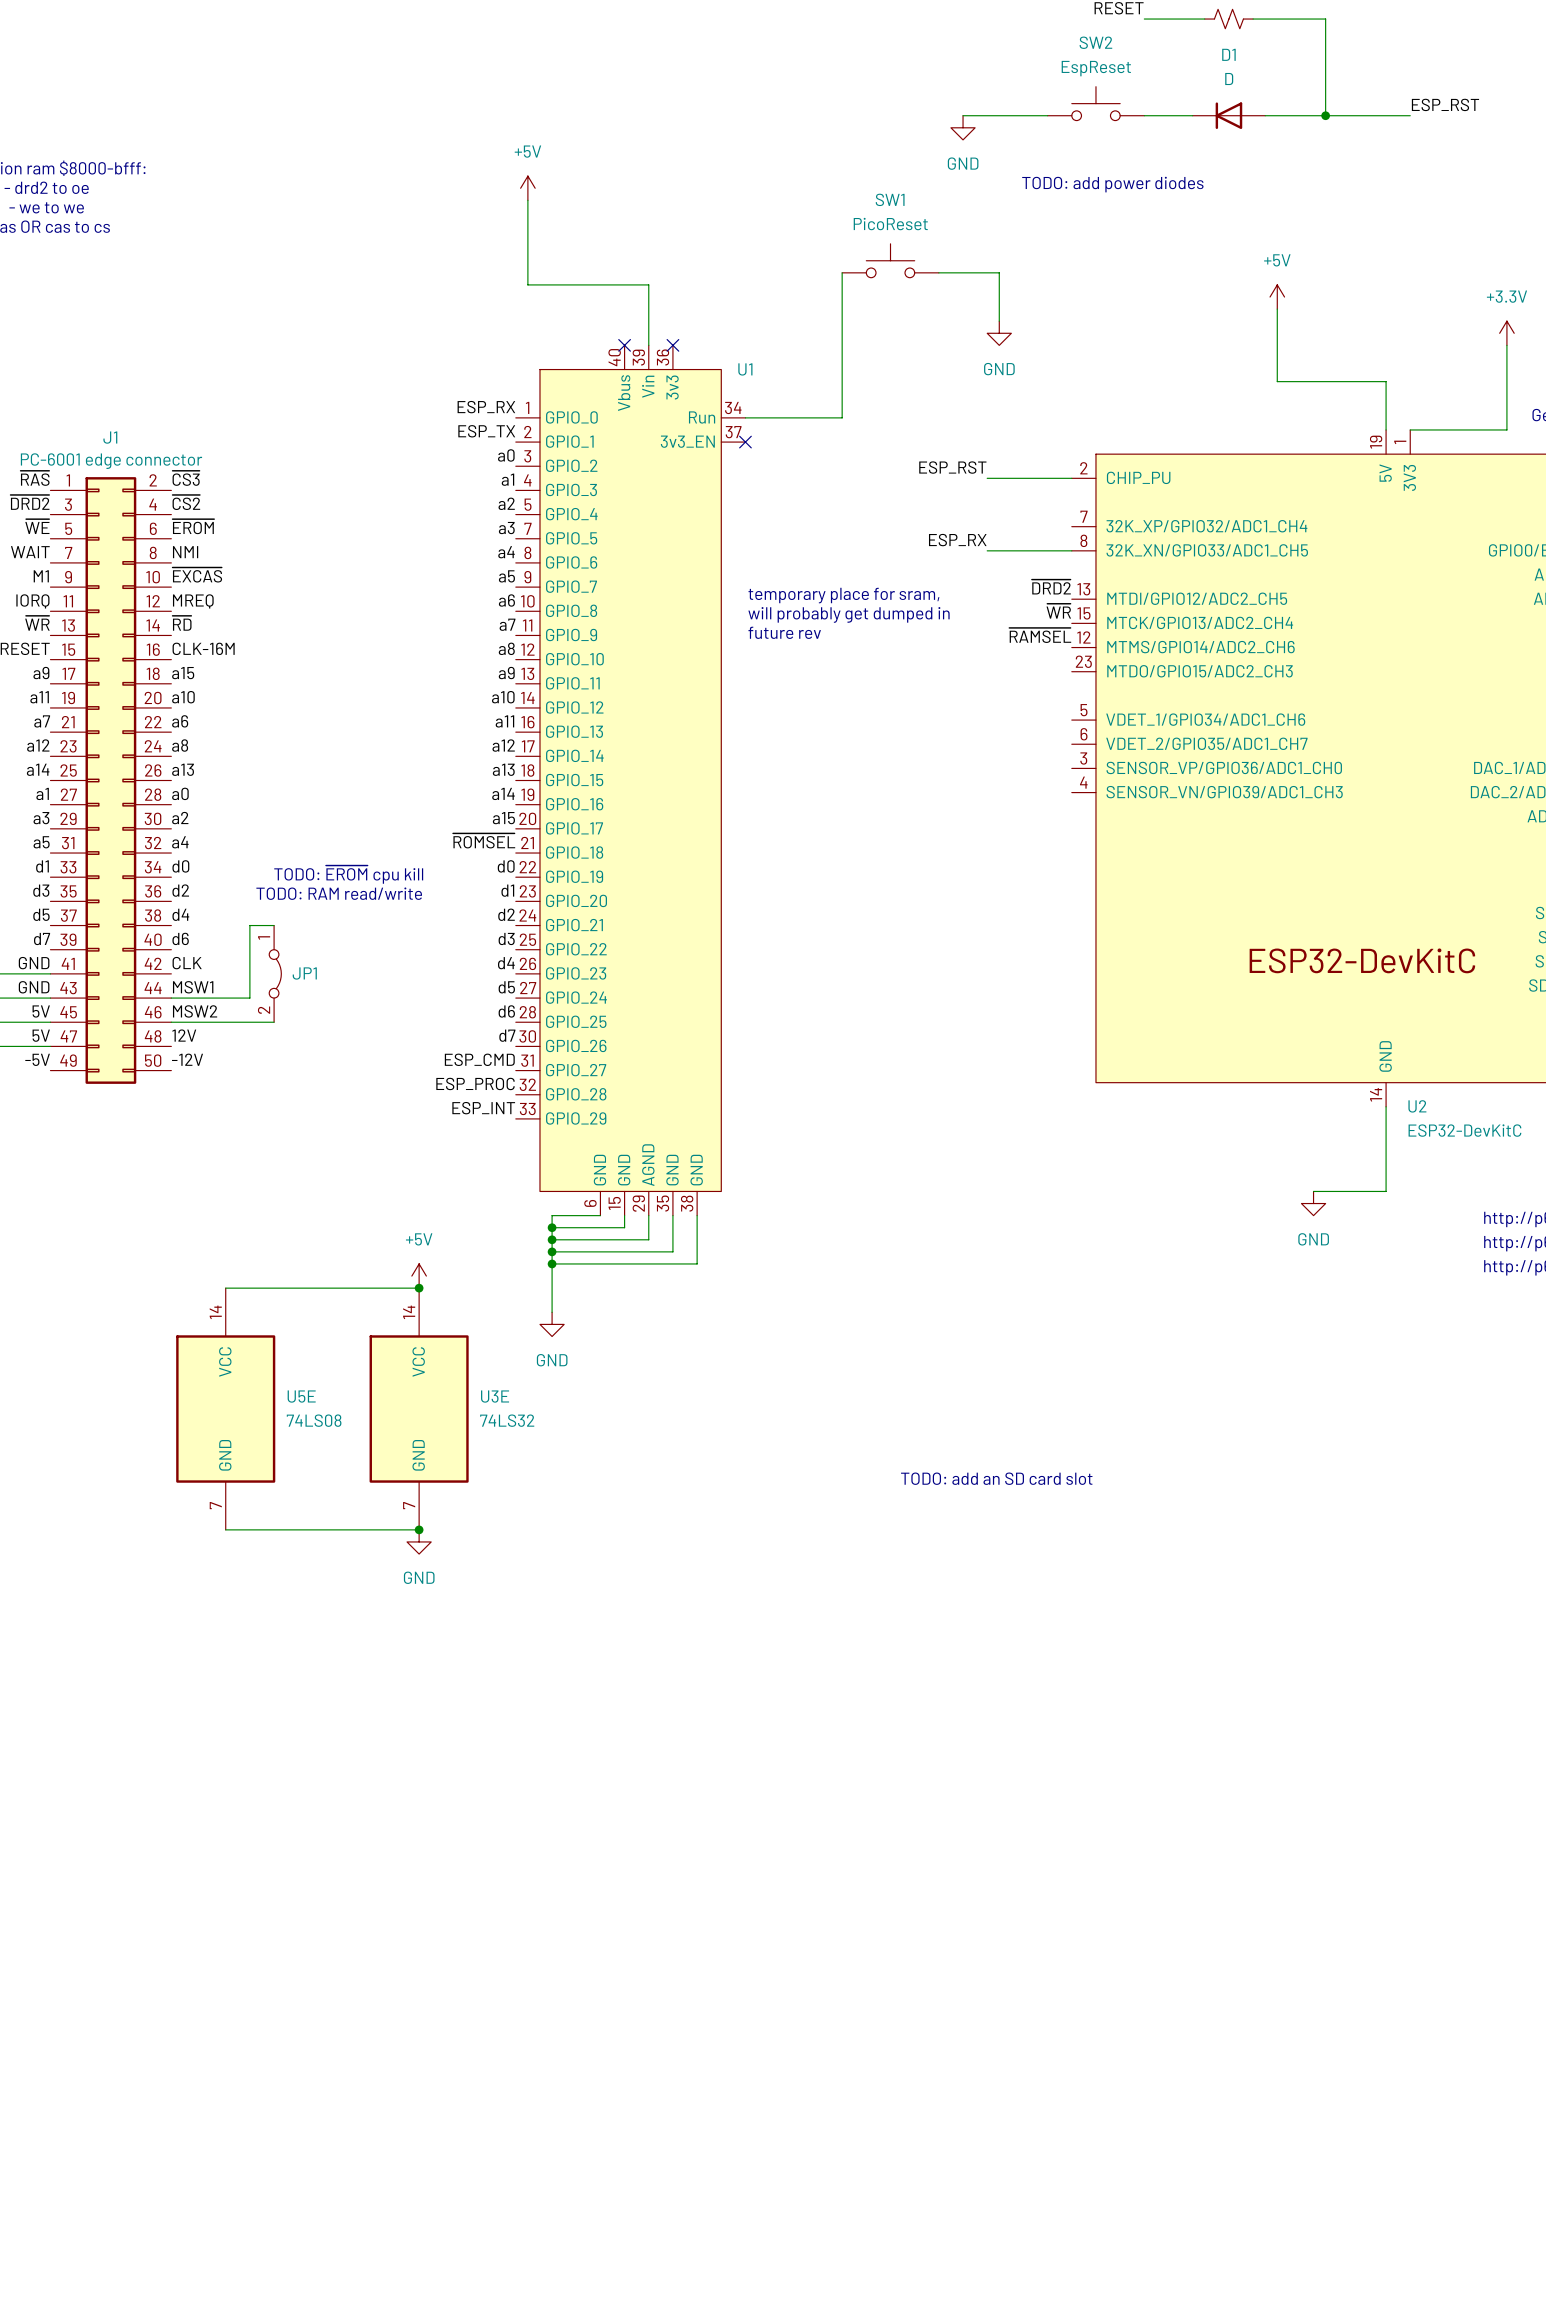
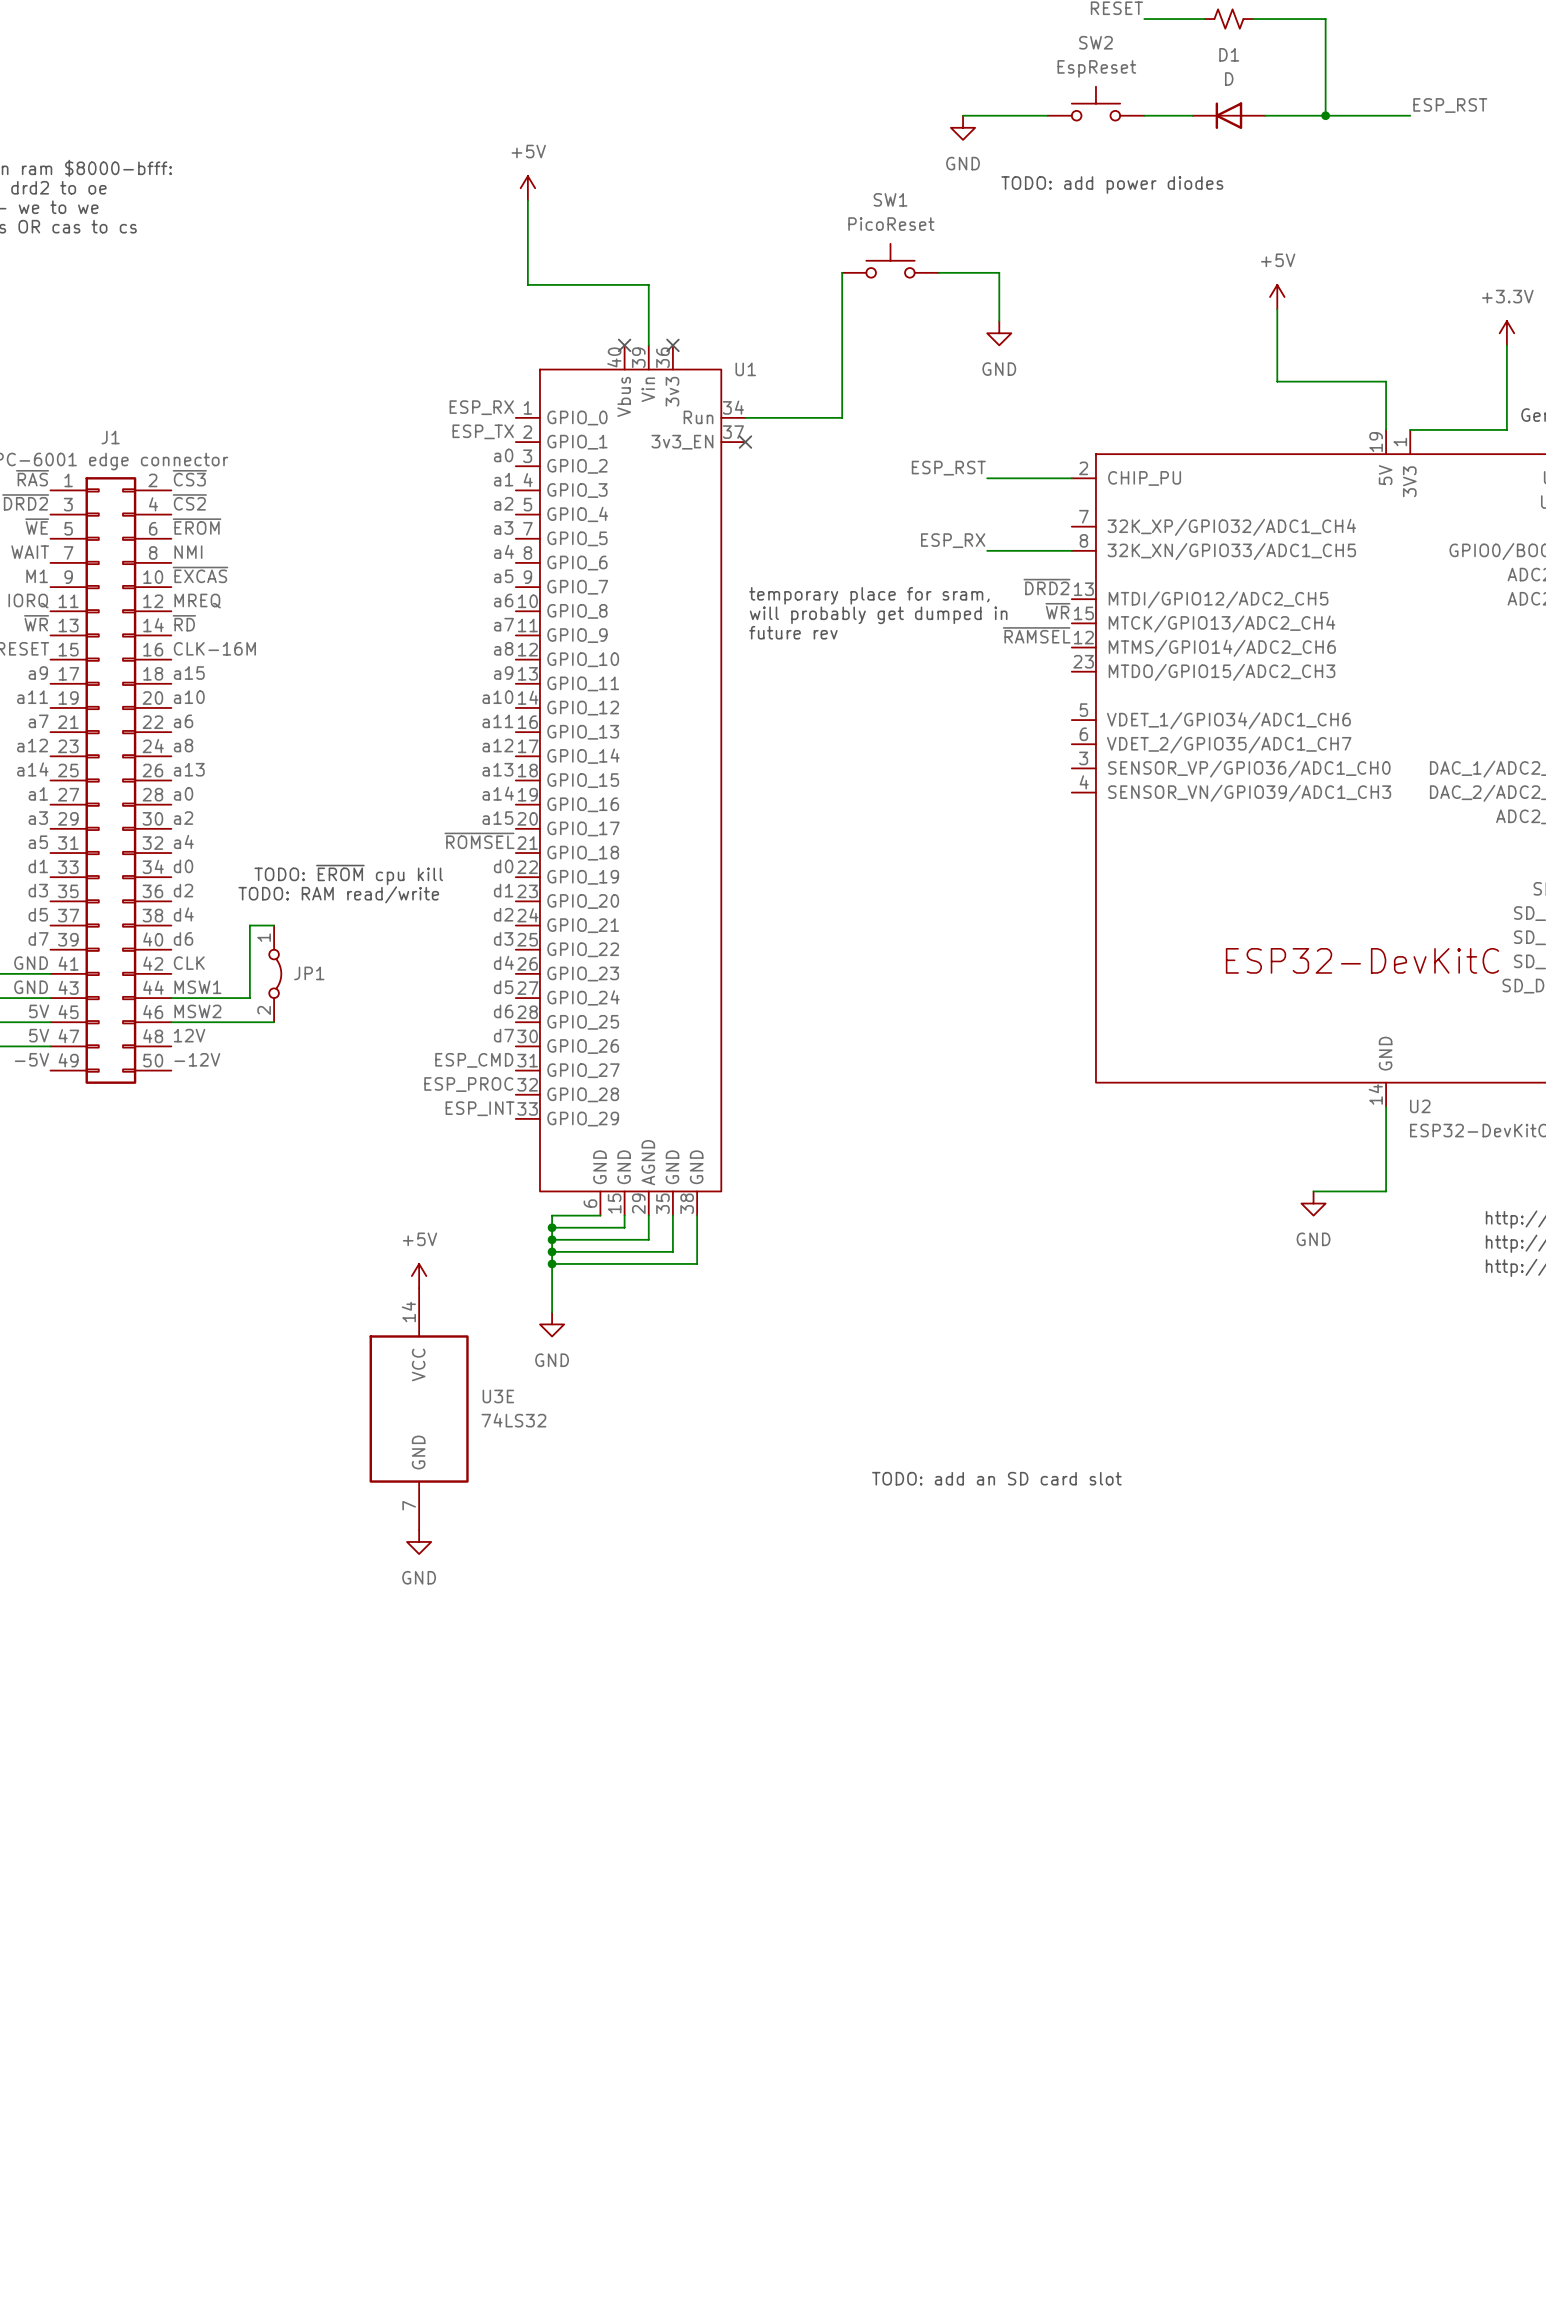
wire: (225, 1288) (419, 1288) -> none
junction: (419, 1288) -> none
U5E: 74LS08 (225, 1409) -> none
wire: (225, 1529) (419, 1529) -> none
junction: (419, 1529) -> none

